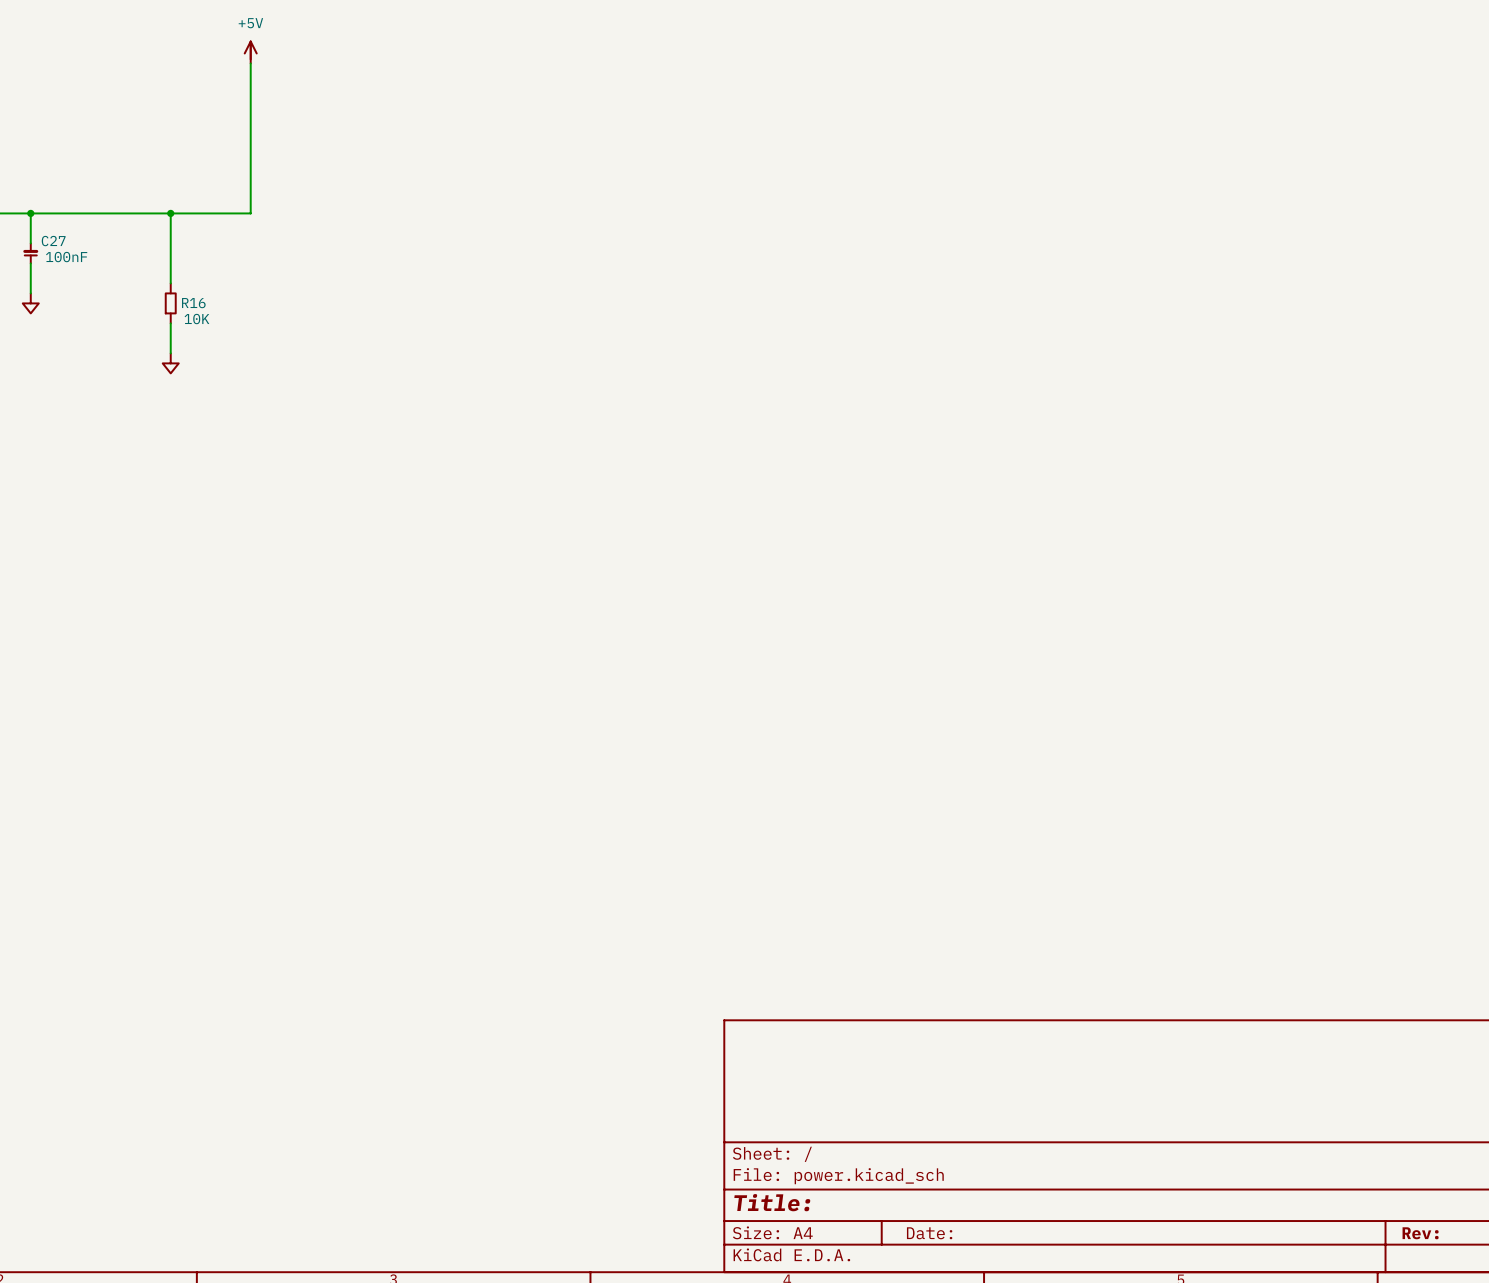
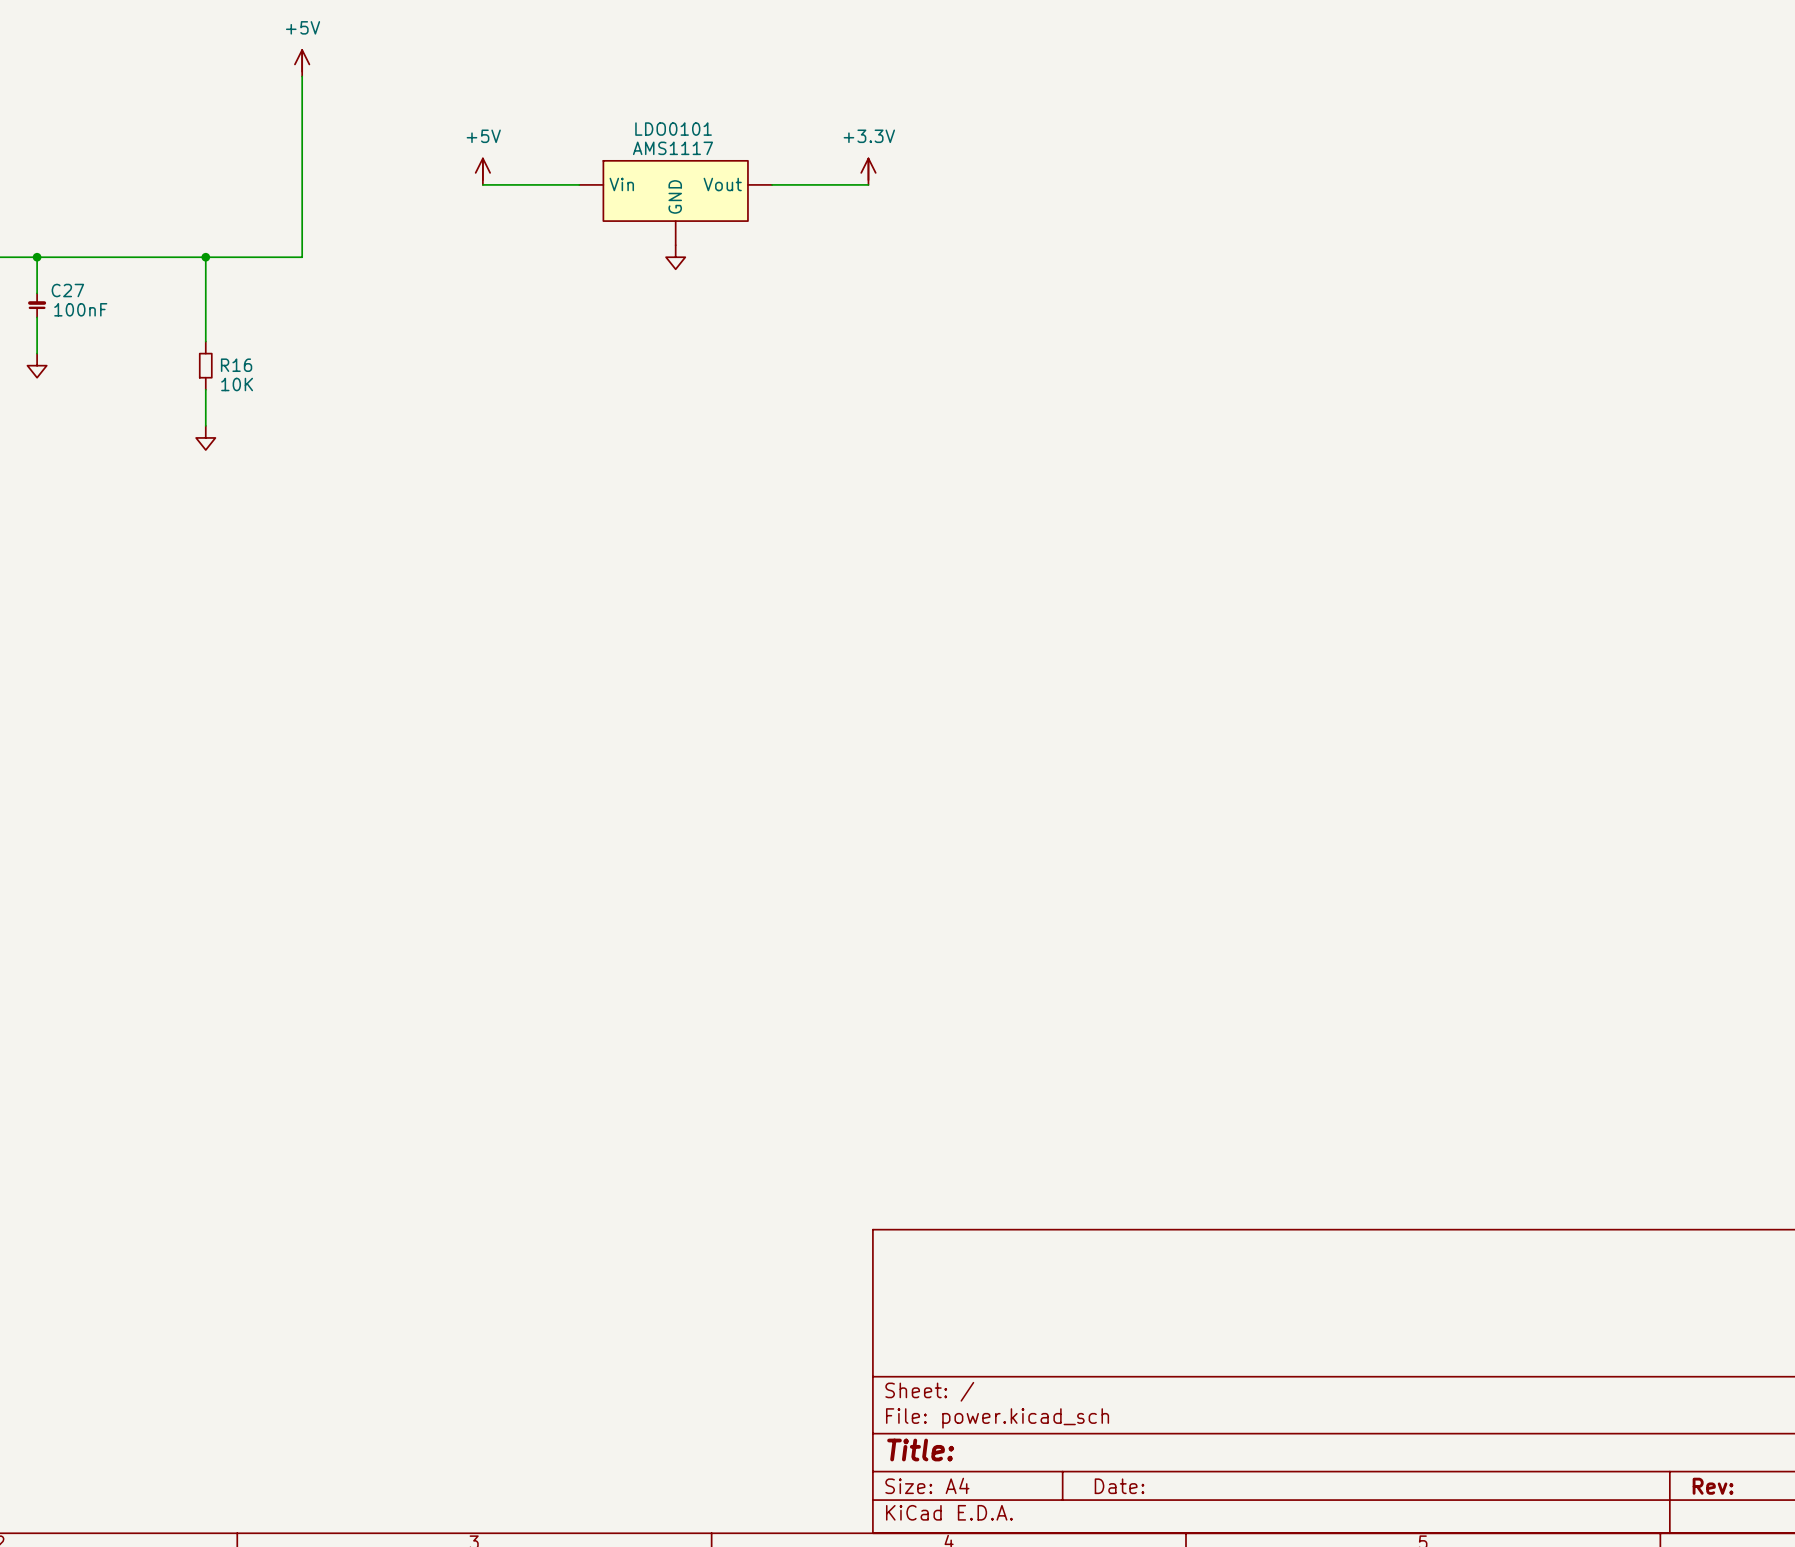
power symbol: none -> +5V (482, 171)
power symbol: none -> +3.3V (868, 171)
wire: none -> (482, 184) (579, 184)
wire: none -> (772, 184) (868, 184)
LDO0101: none -> AMS1117 (675, 203)
power symbol: none -> (675, 257)

